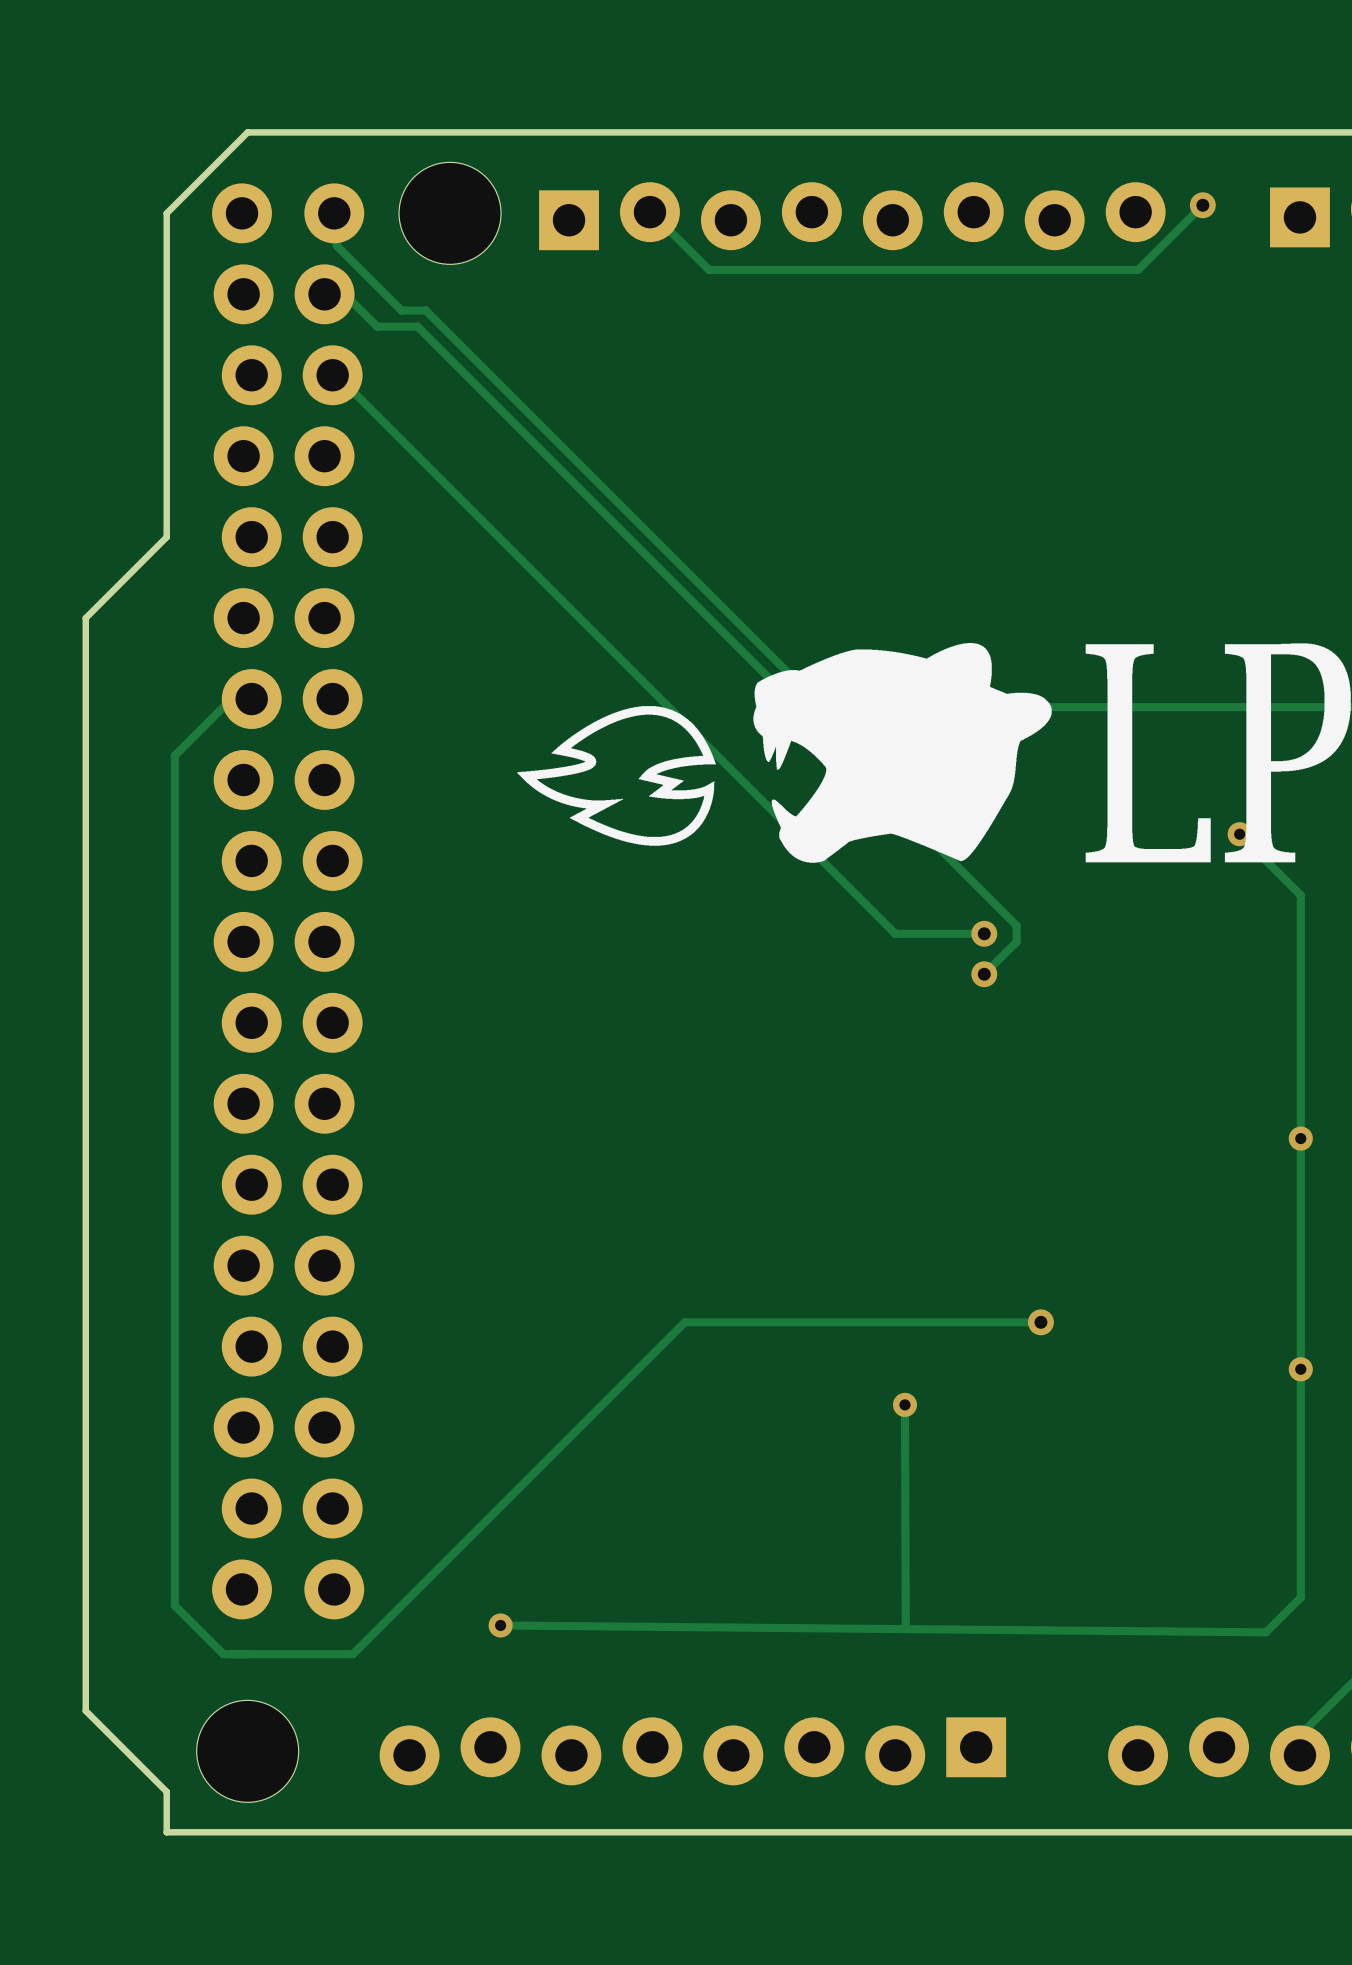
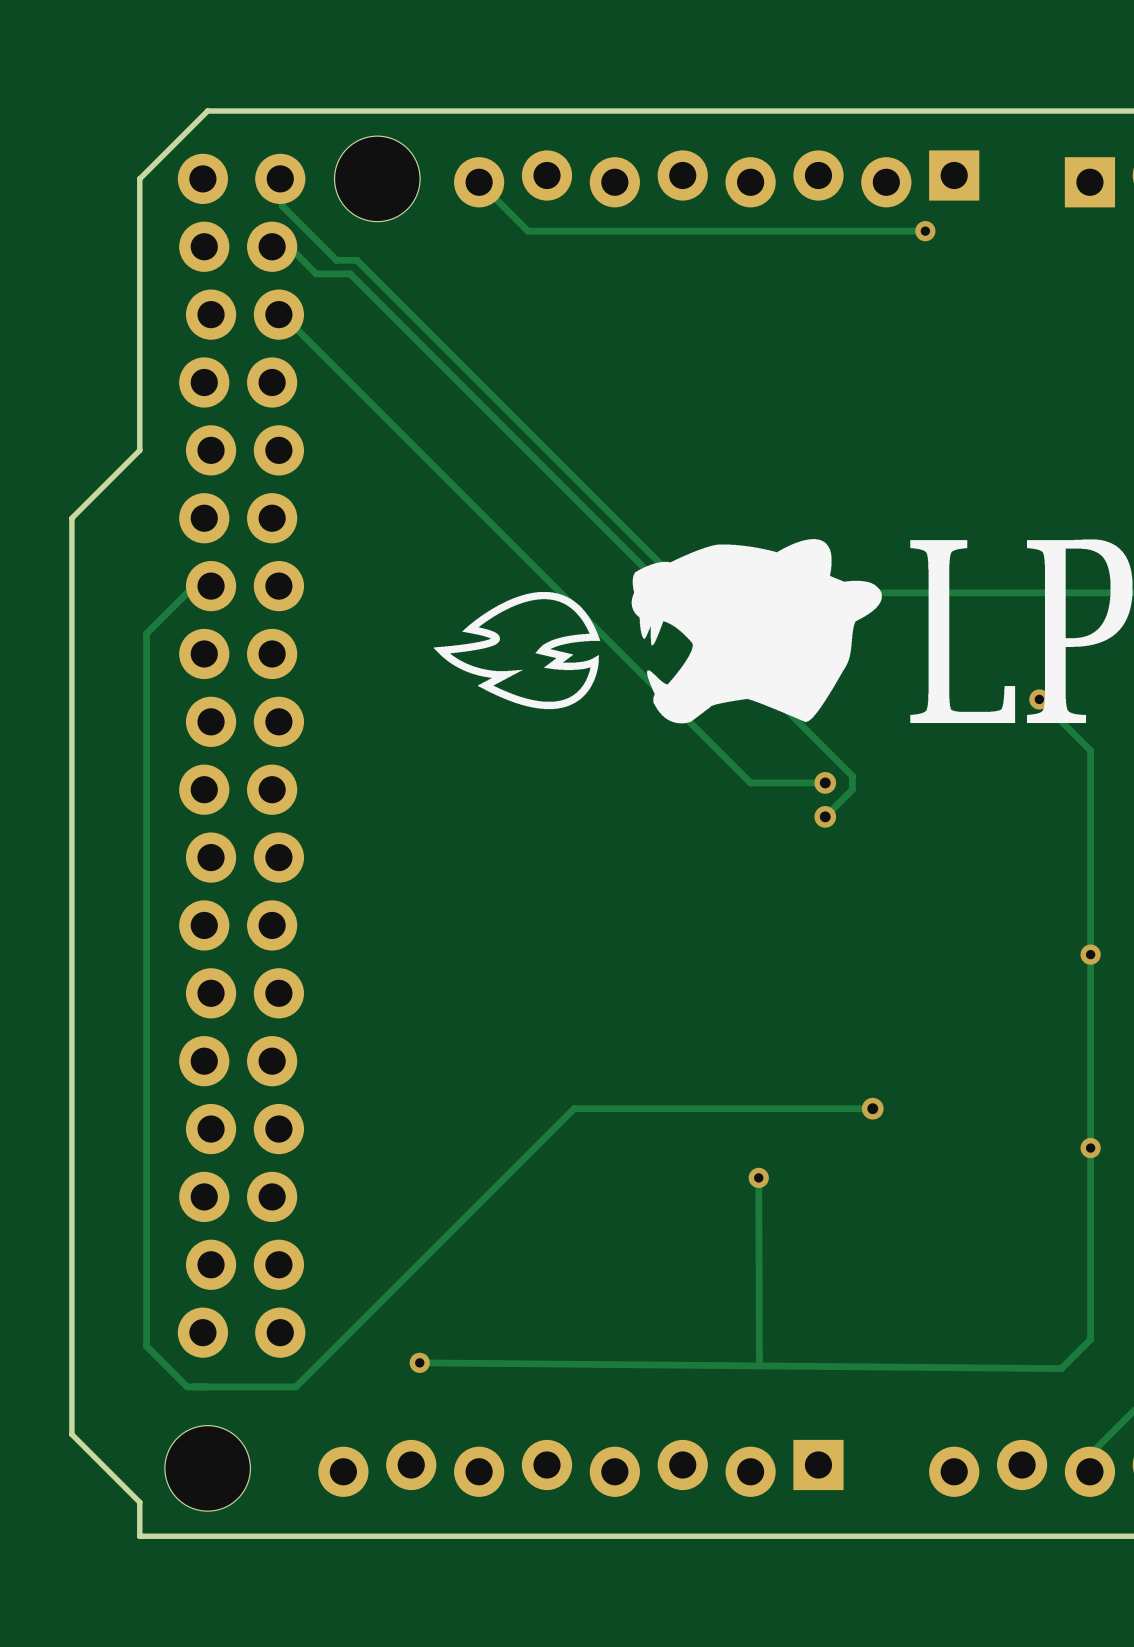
track: (1202, 205) (1138, 270) (709, 270) (649, 212) -> none
via: (1202, 205) -> none
part rotation: 0° (852, 216) -> 180° (716, 178)
track: none -> (479, 182) (527, 231) (925, 231)
via: none -> (925, 231)

